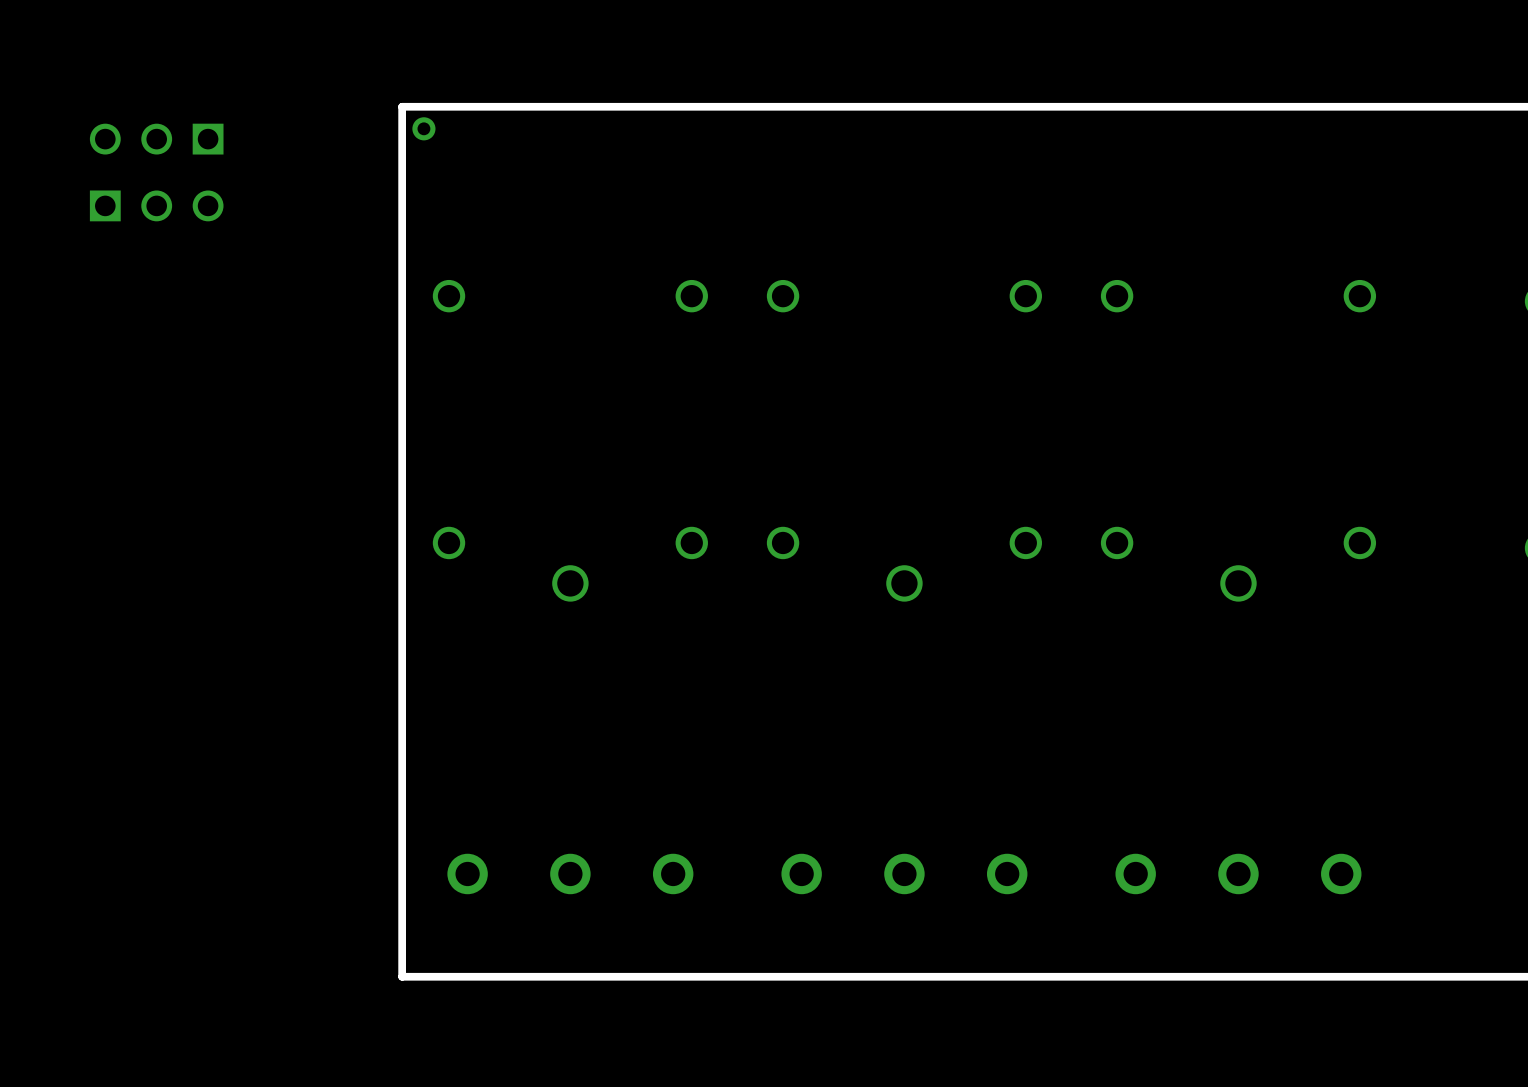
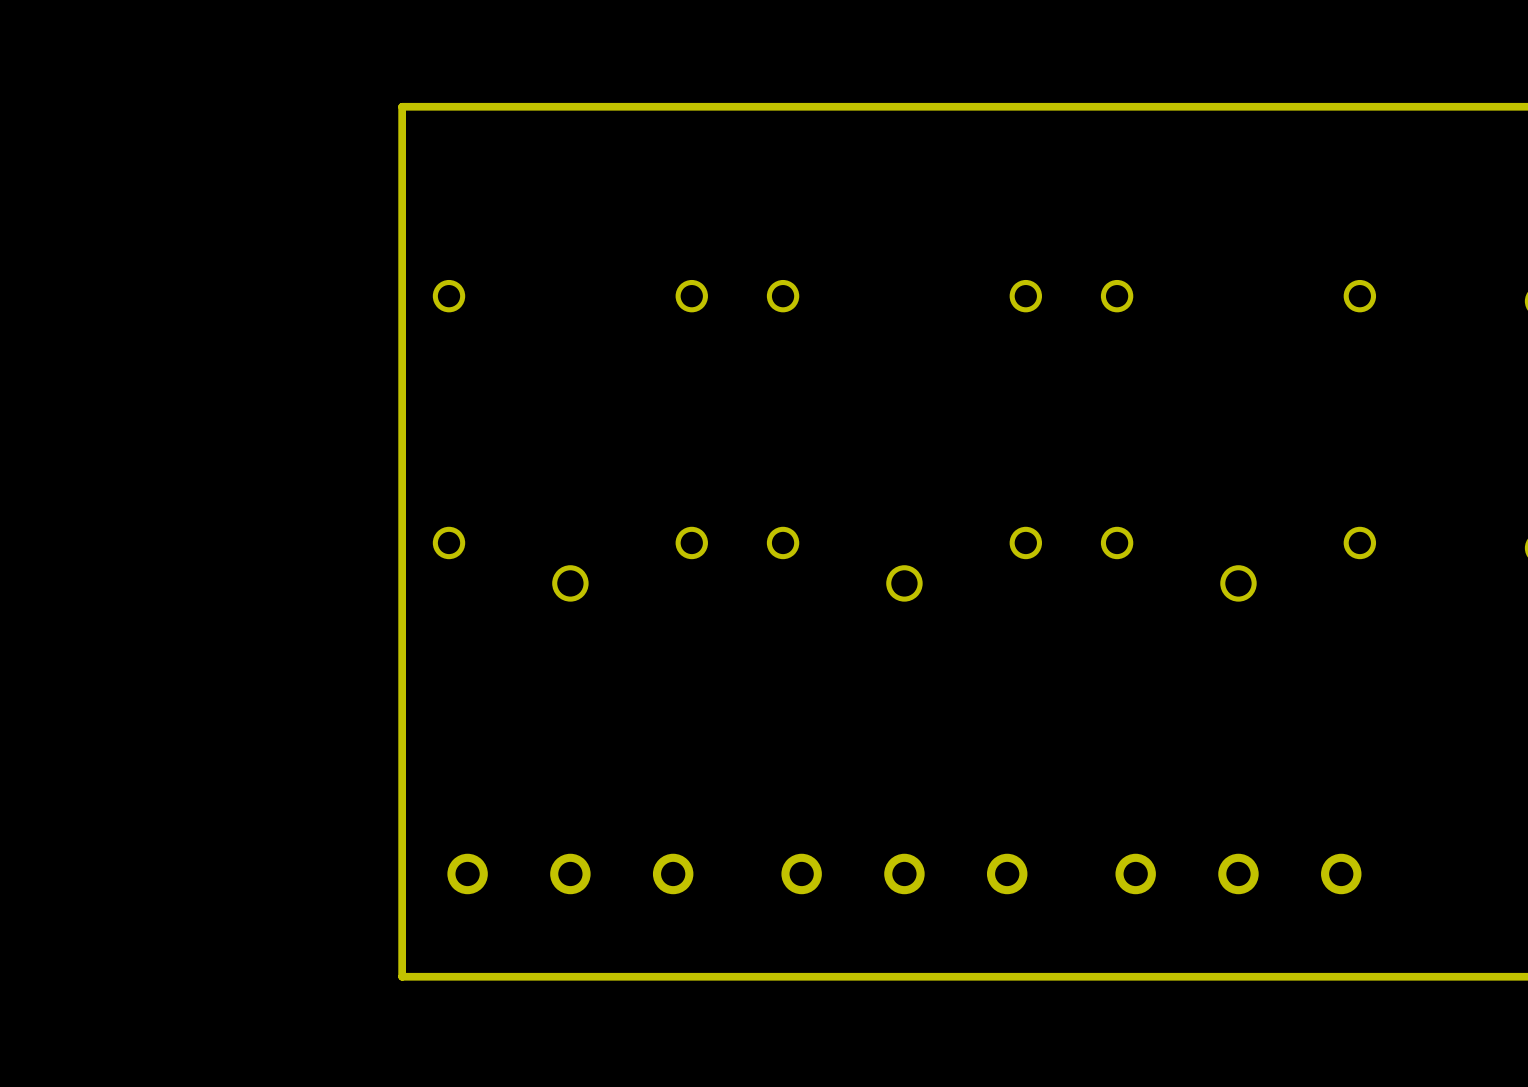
part: (423, 128) -> none
part: (156, 139) -> none
part: (156, 205) -> none

